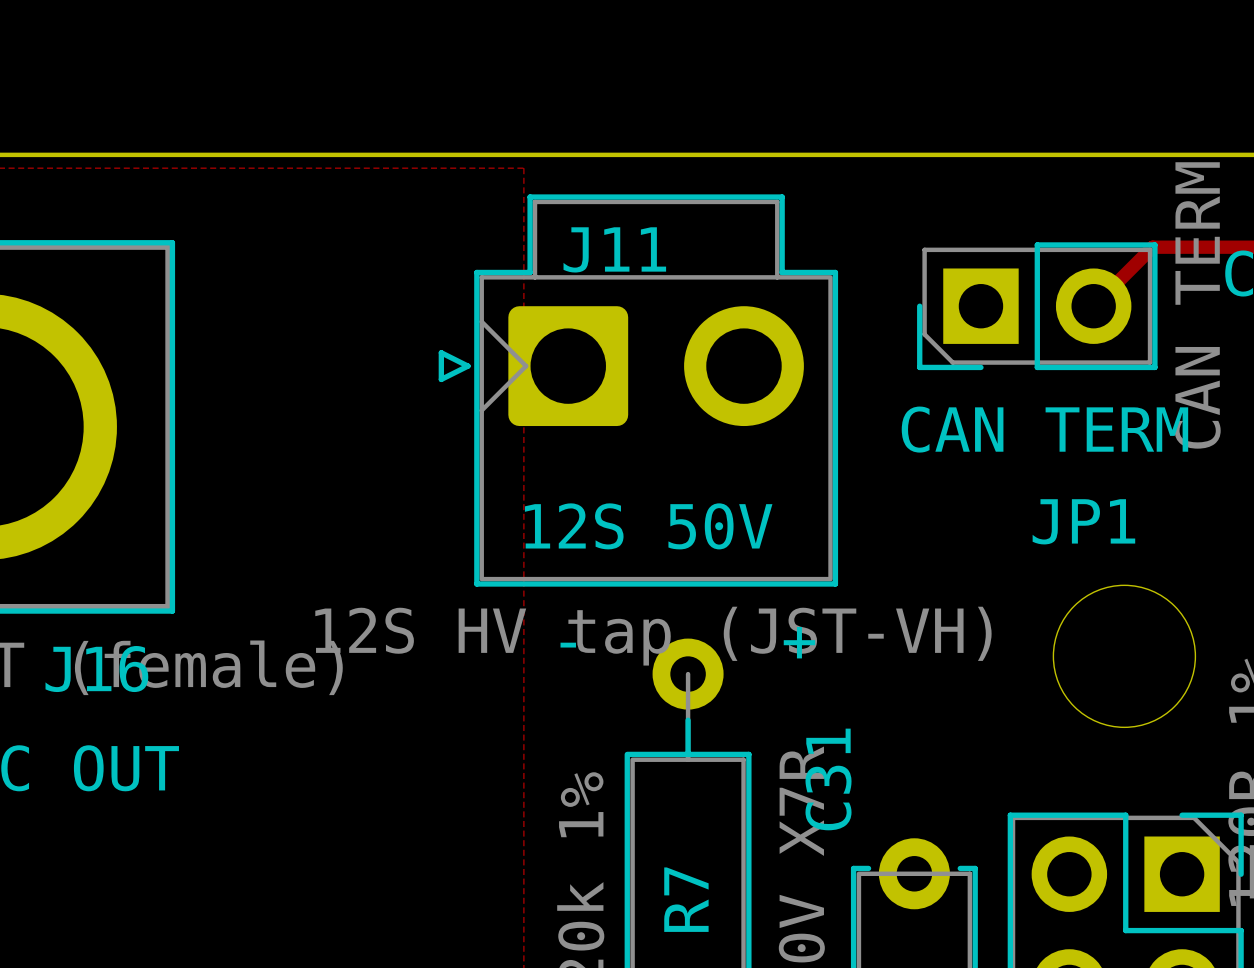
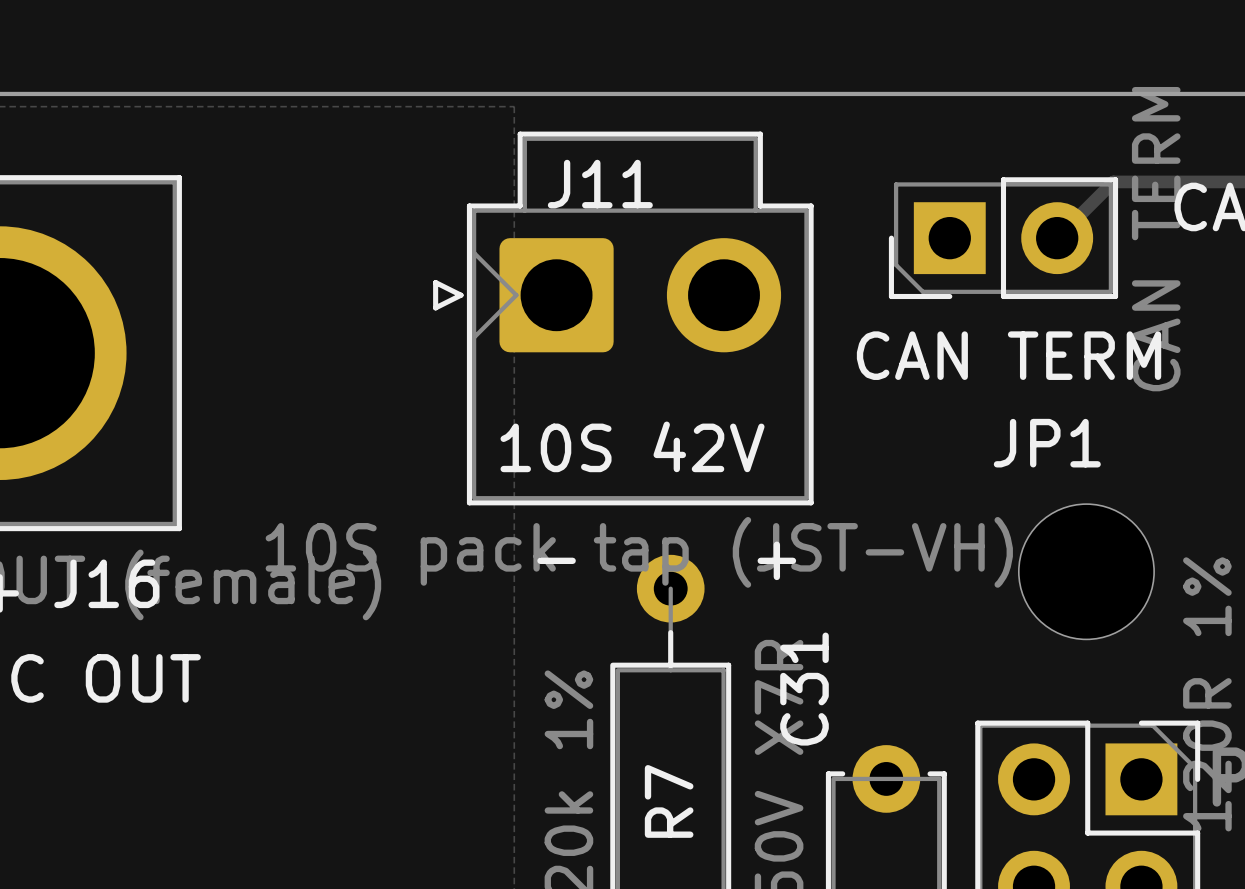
text: 12S 50V (648, 526) -> 10S 42V (632, 446)
J11 value: 12S HV tap (JST-VH) (653, 636) -> 10S pack tap (JST-VH) (639, 552)

